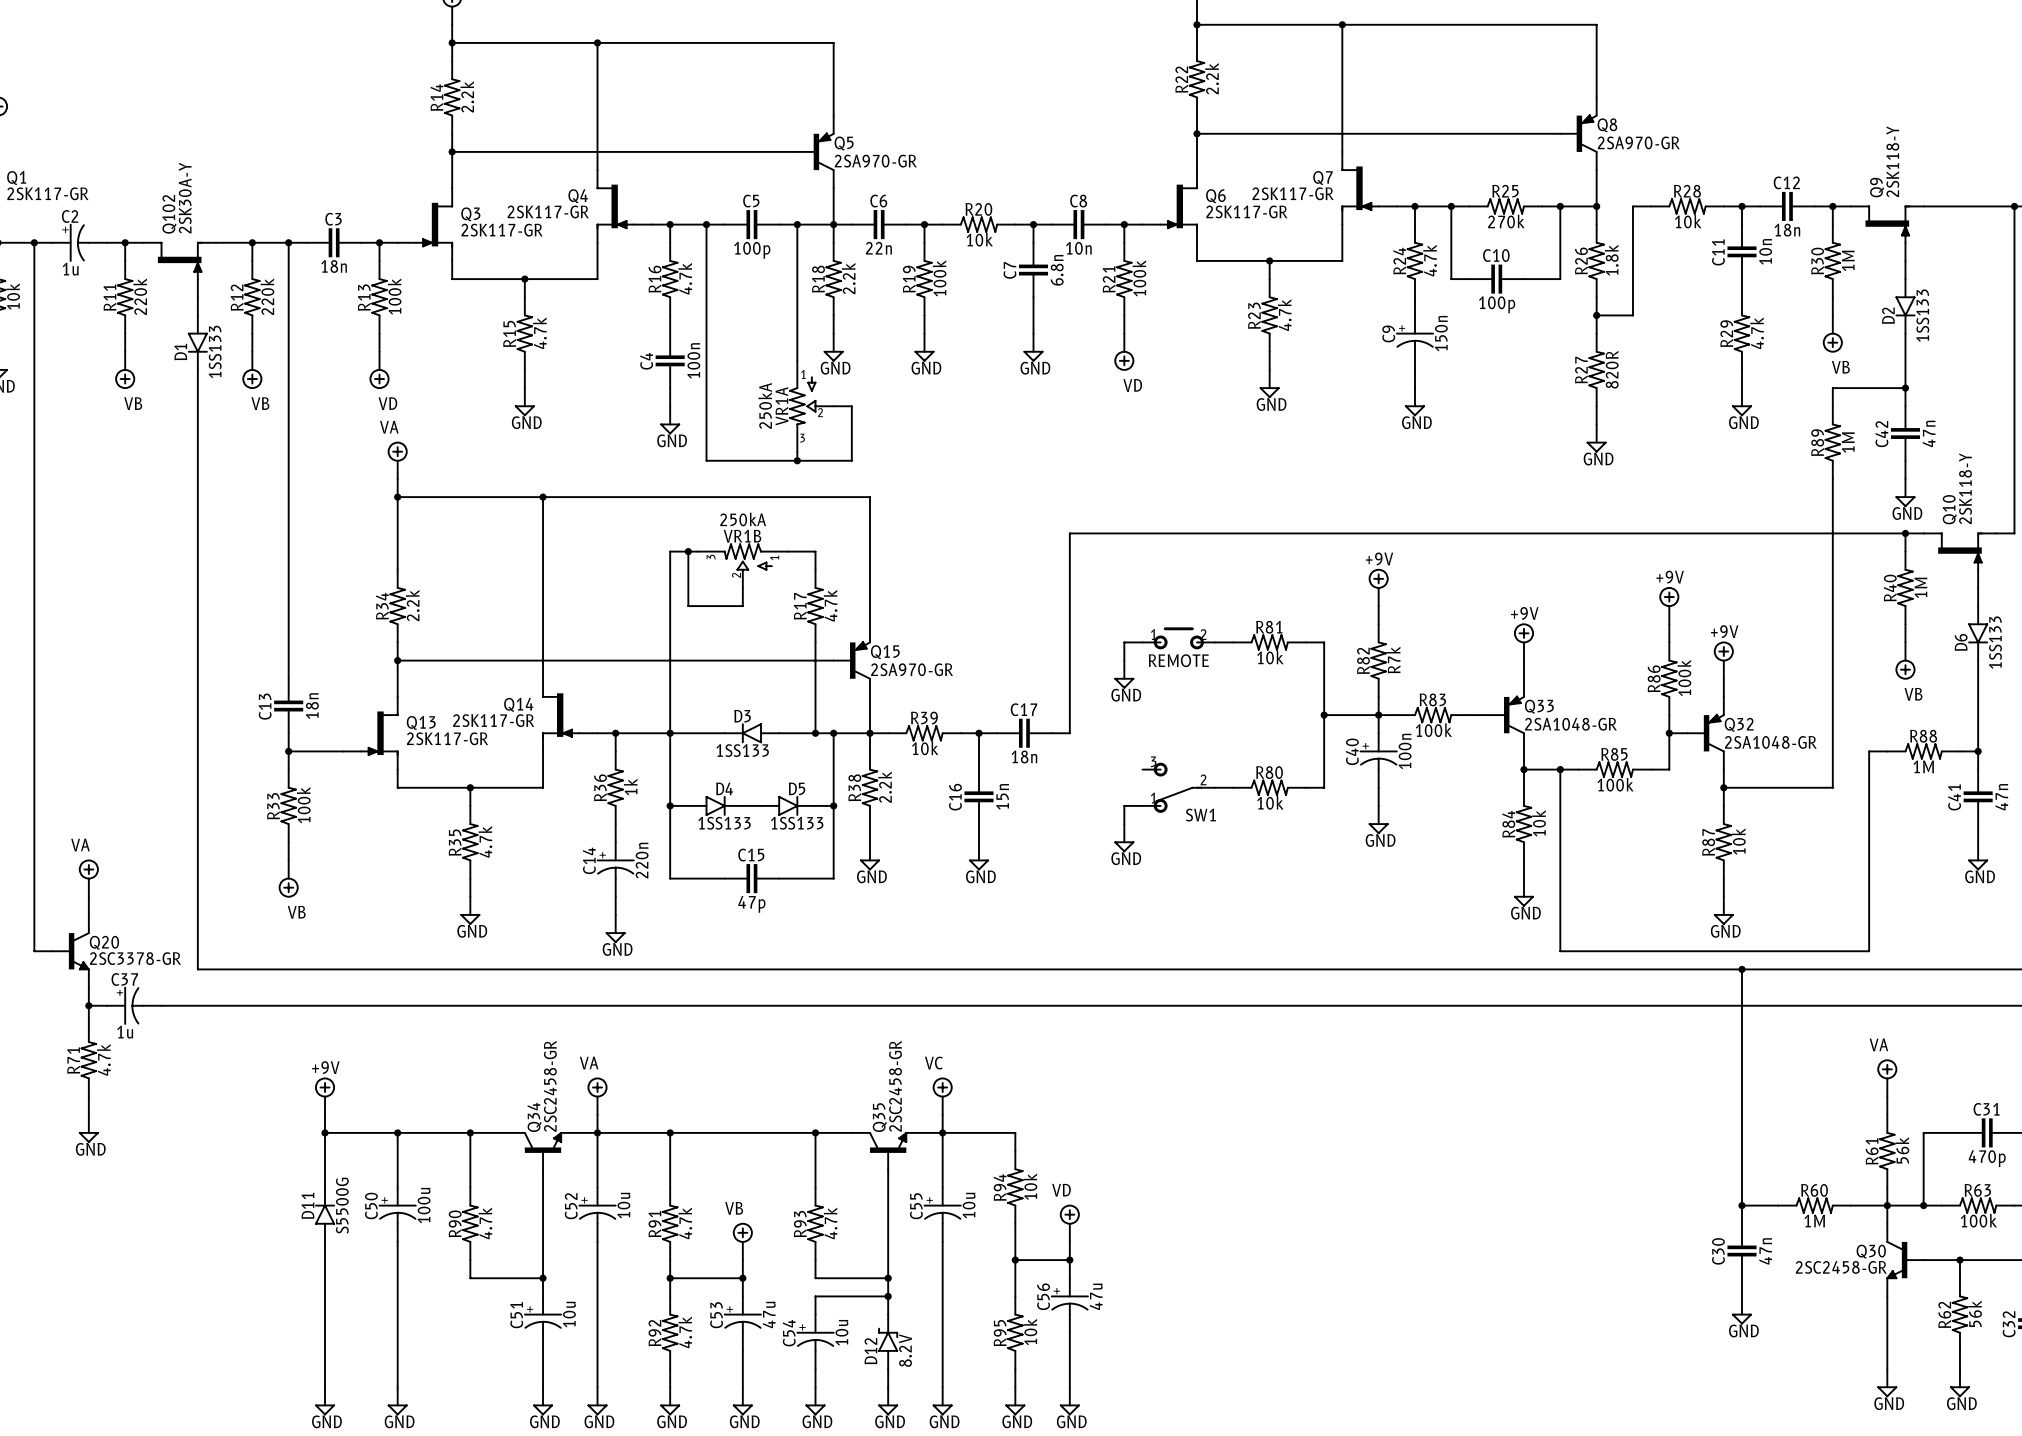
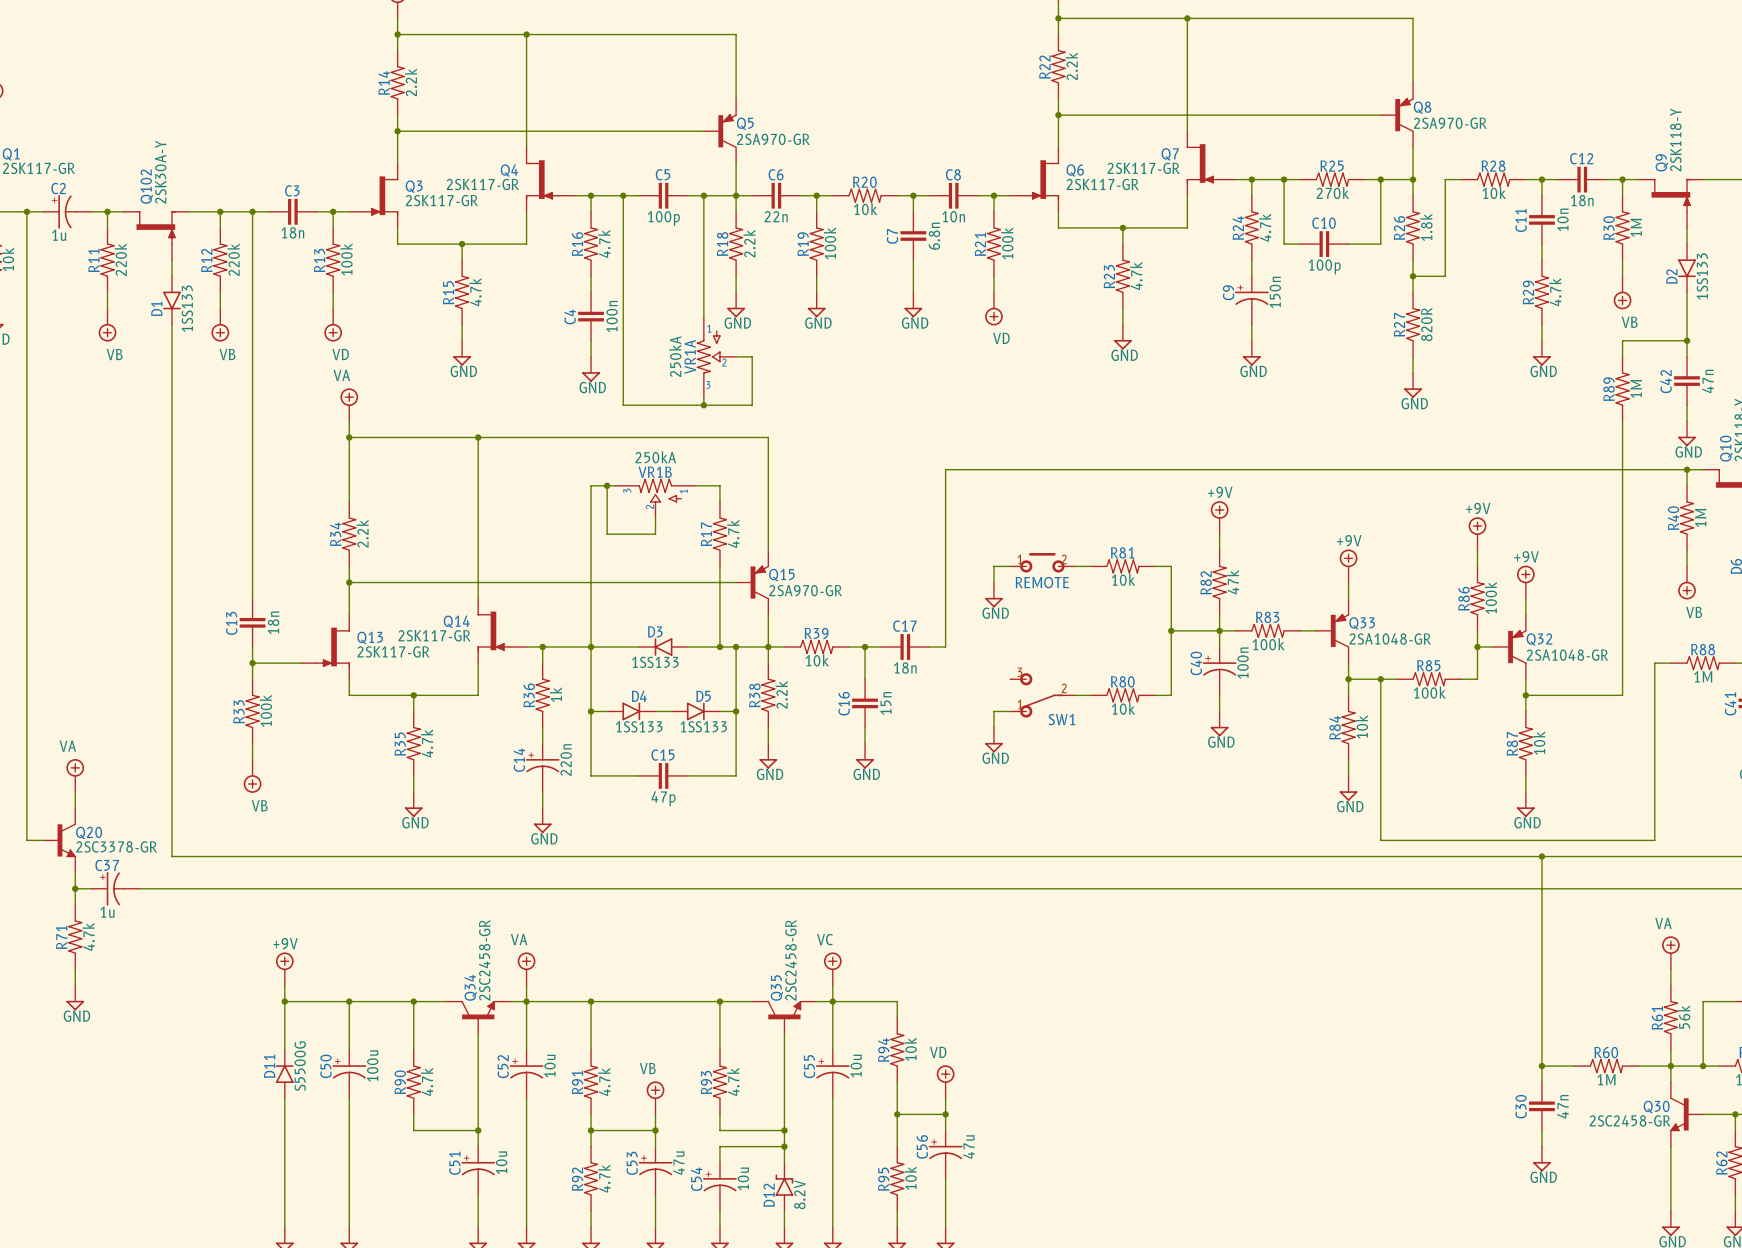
R82 value: R7k (1393, 660) -> 47k (1232, 582)

